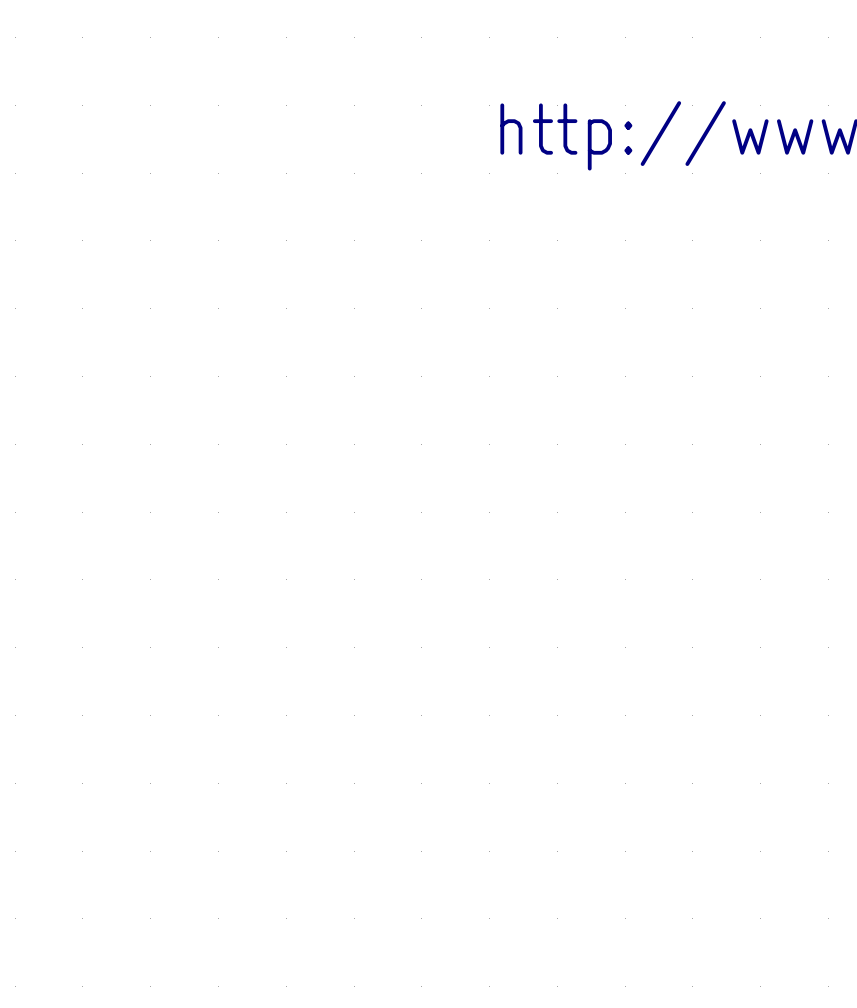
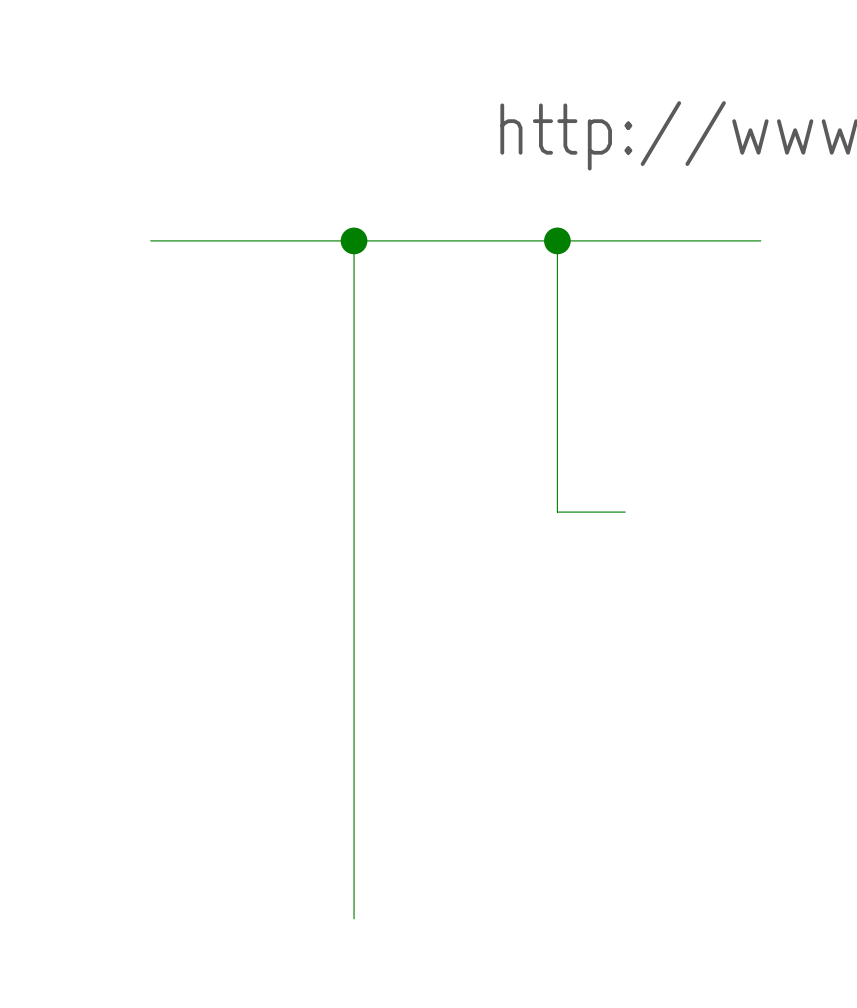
wire: none -> (150, 240) (760, 240)
wire: none -> (354, 240) (354, 918)
junction: none -> (354, 240)
wire: none -> (557, 240) (557, 512) (625, 512)
junction: none -> (557, 240)

